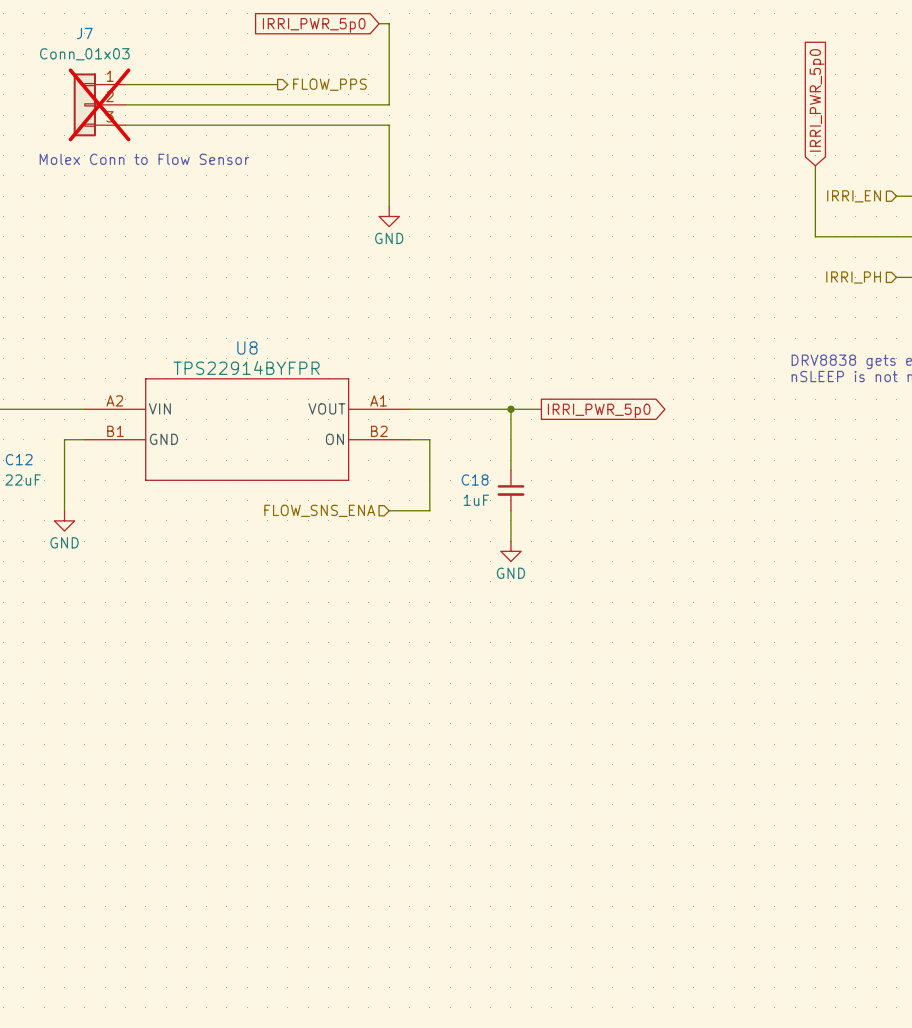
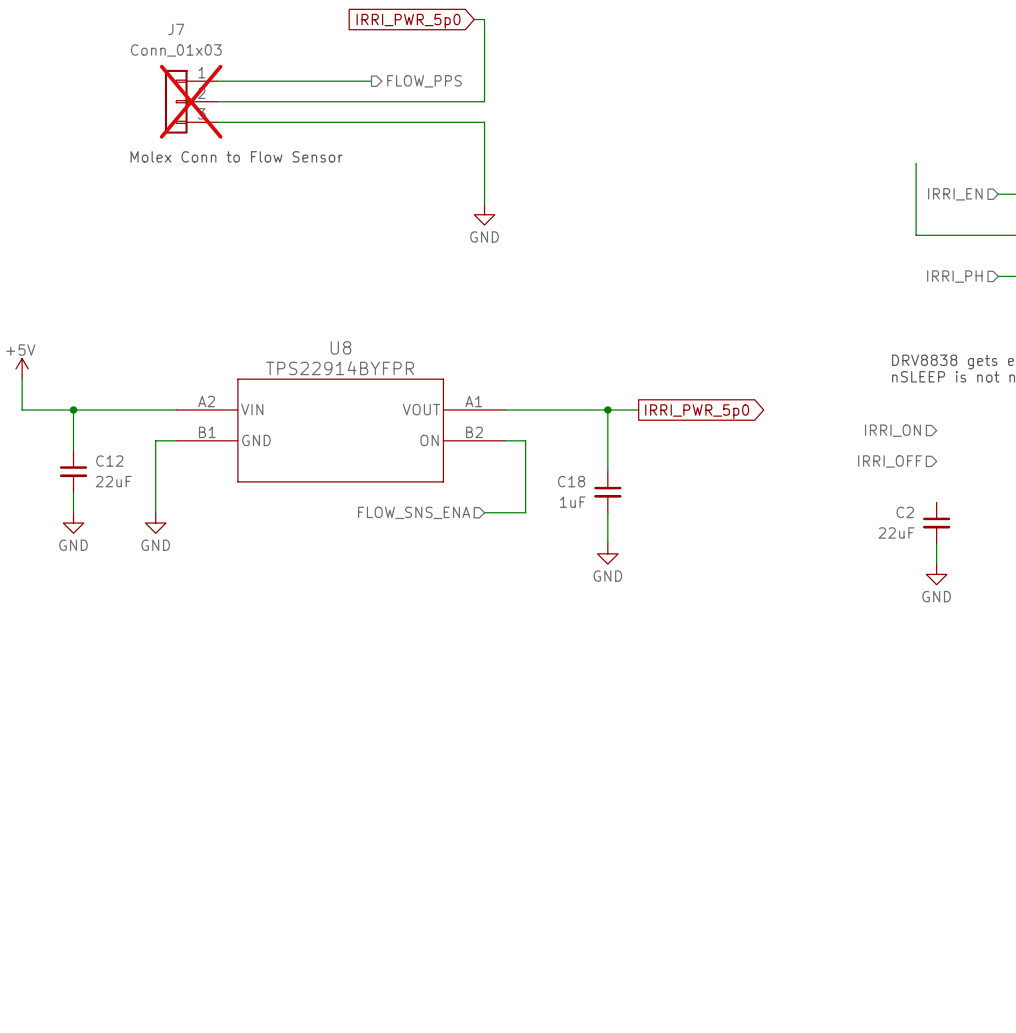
global label: IRRI_PWR_5p0 (817, 100) -> none
hierarchical label: none -> IRRI_ON (892, 430)
hierarchical label: none -> IRRI_OFF (890, 461)
C2: none -> 22uF (936, 523)
wire: none -> (936, 543) (936, 564)
power symbol: none -> GND (936, 574)

